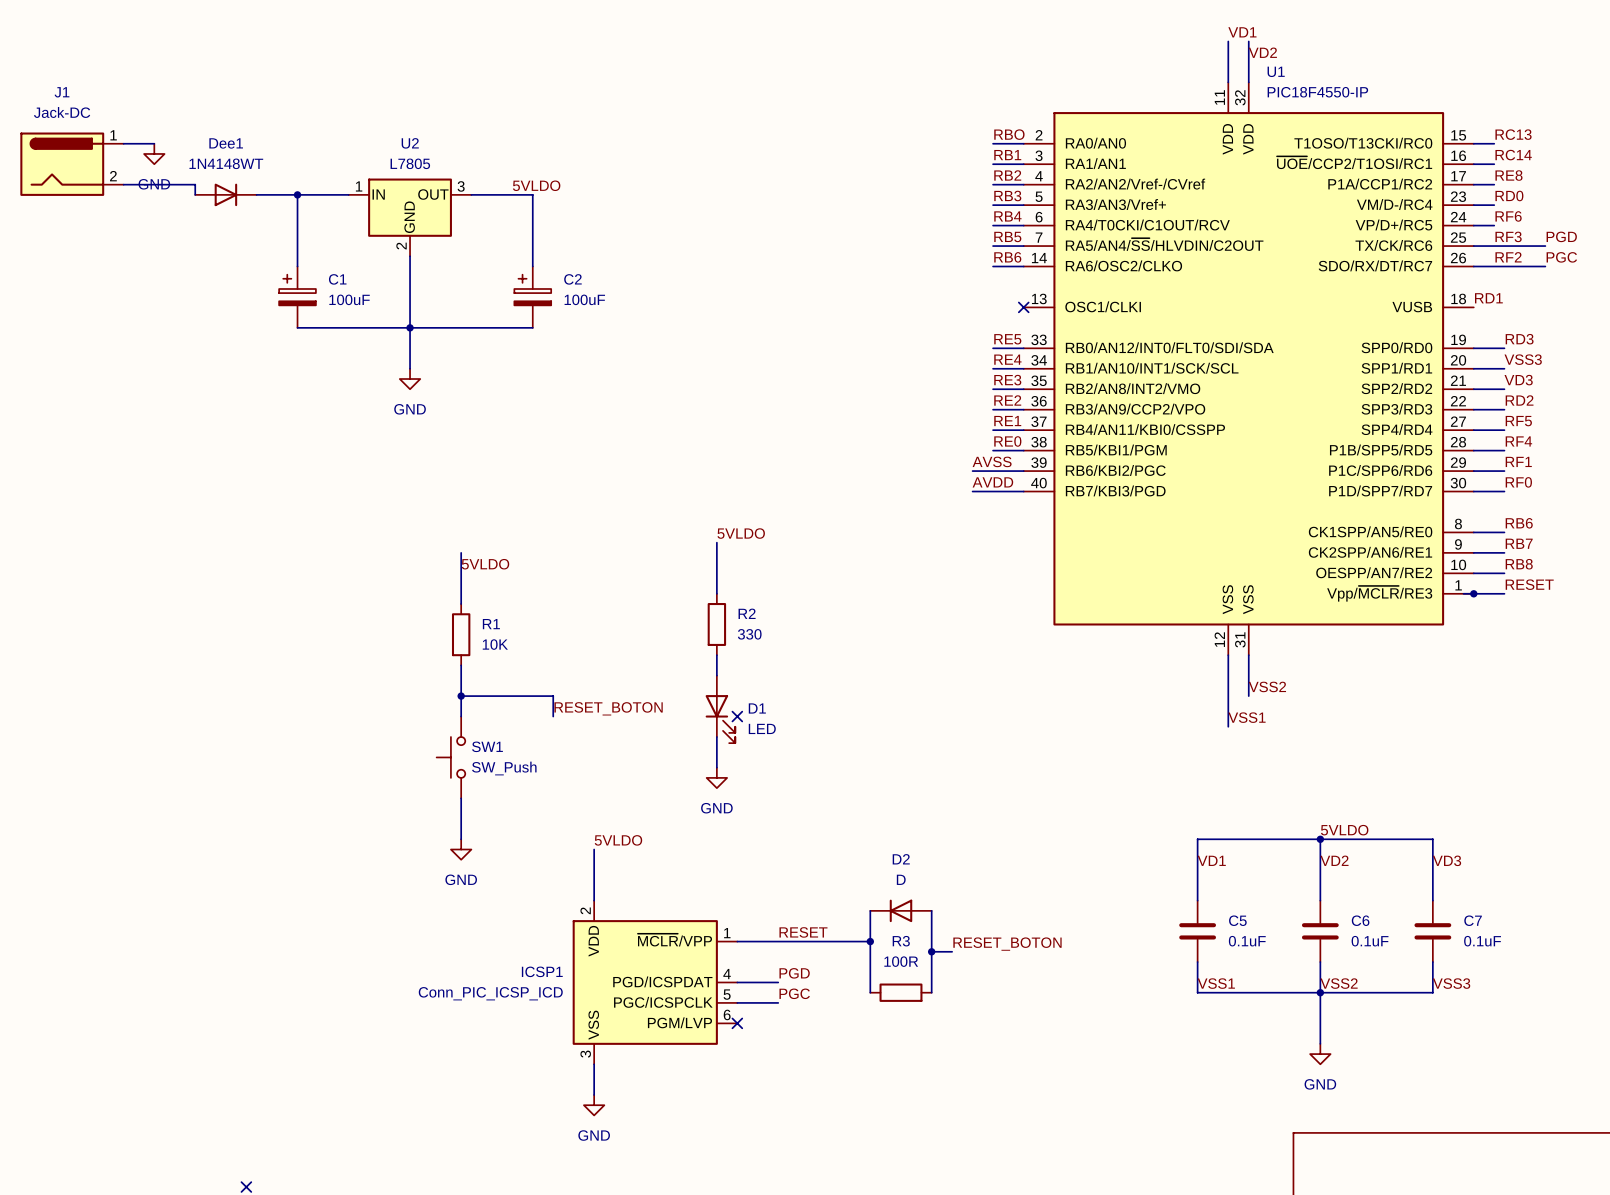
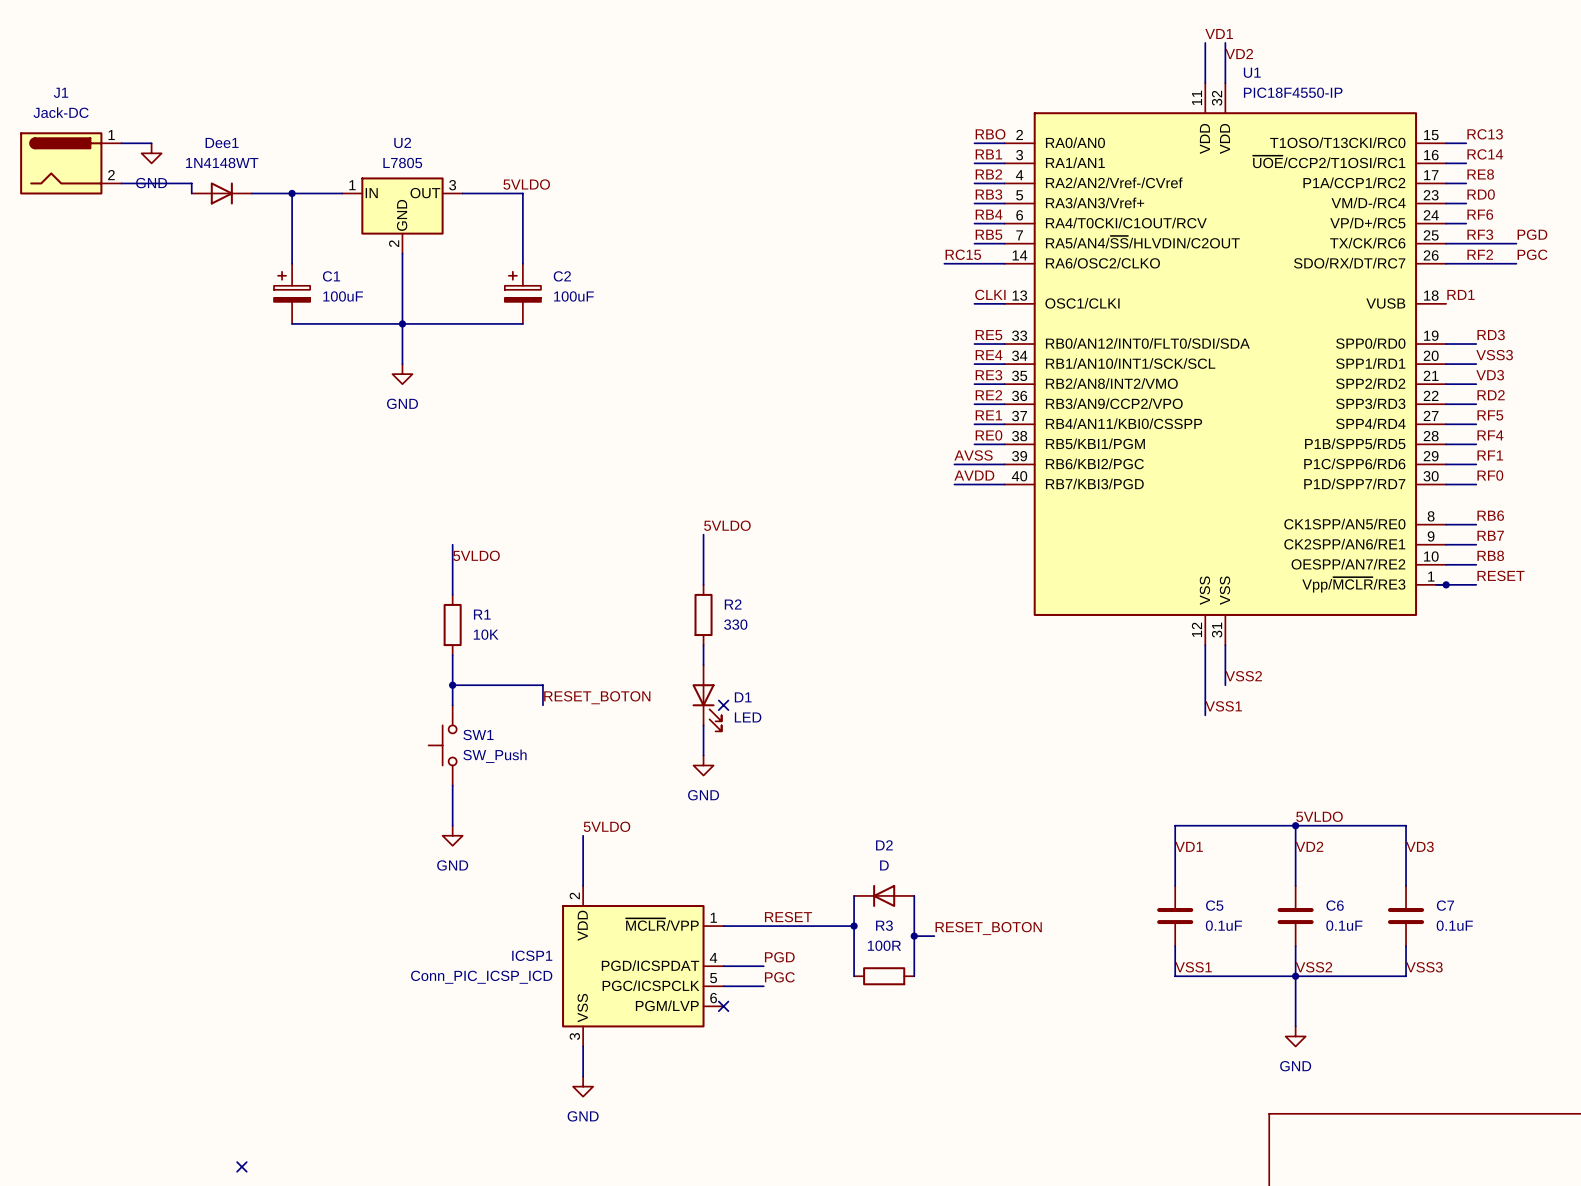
label: none -> RC15 (963, 254)
label: RB6 (1007, 257) -> none
wire: none -> (944, 263) (974, 263)
label: none -> CLKI (990, 294)
wire: none -> (974, 303) (1004, 303)
no-connect mark: (1023, 307) -> none

